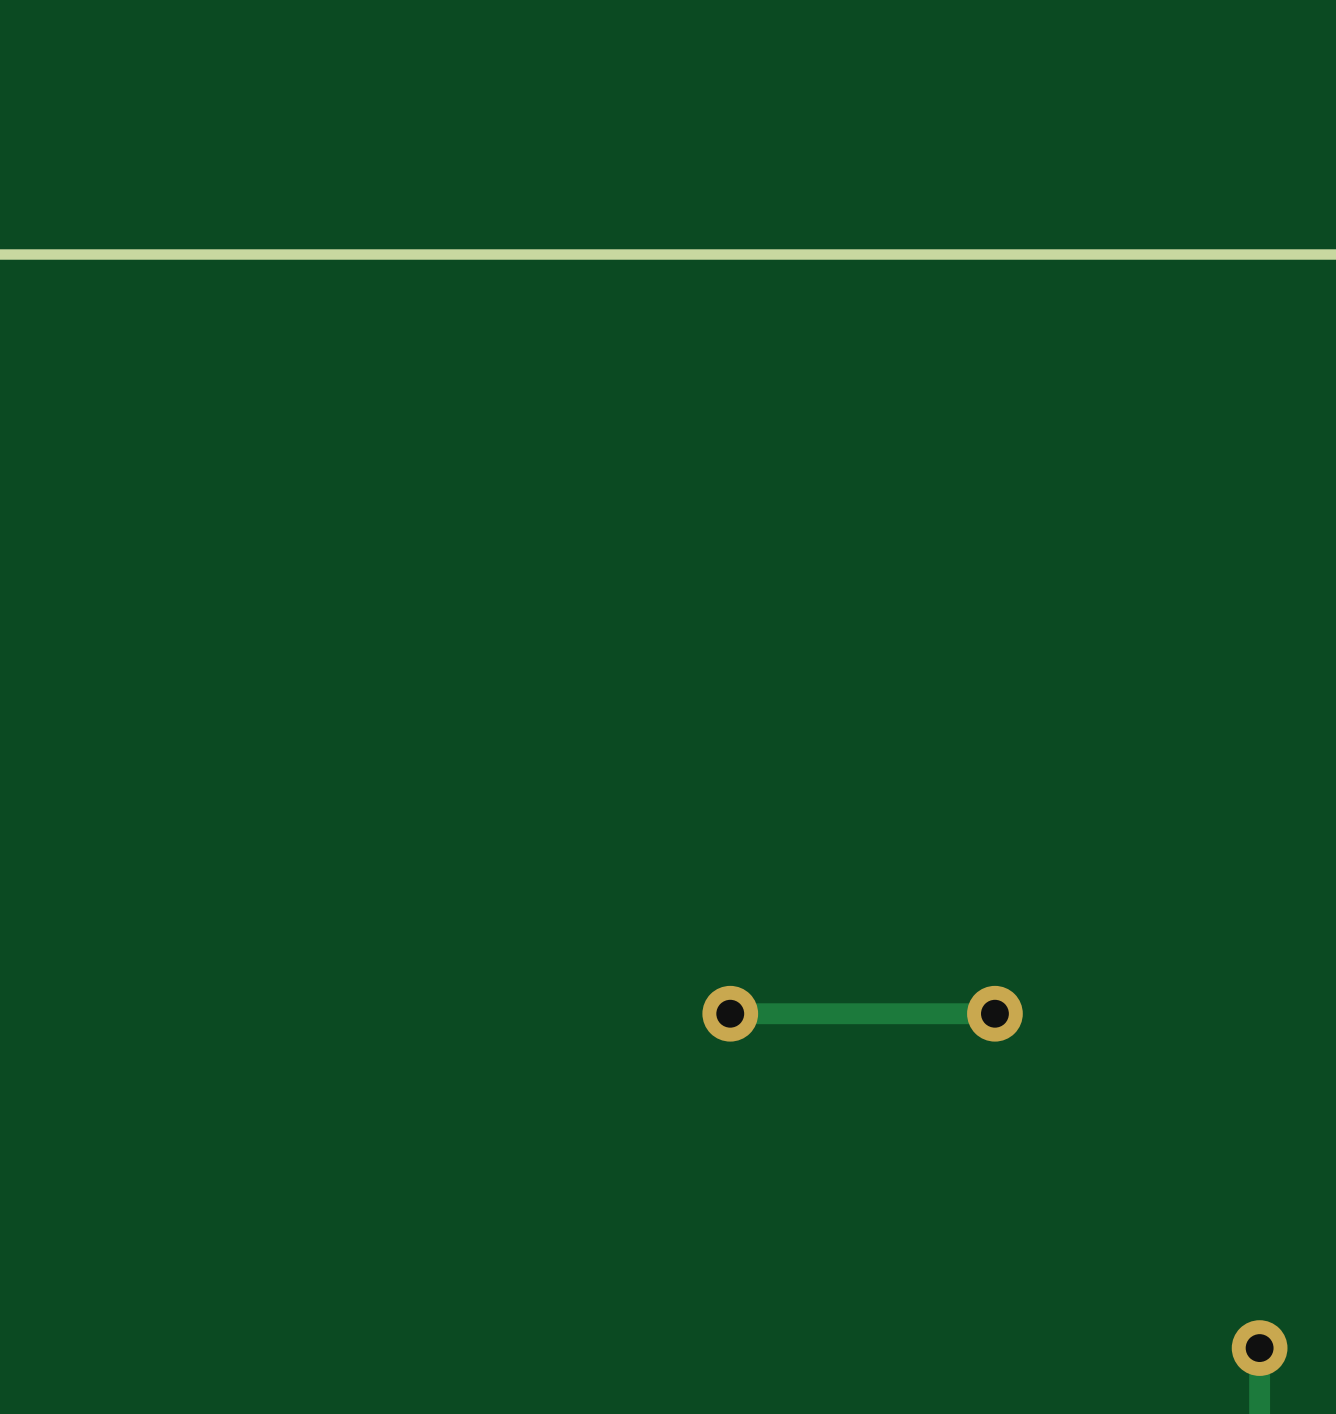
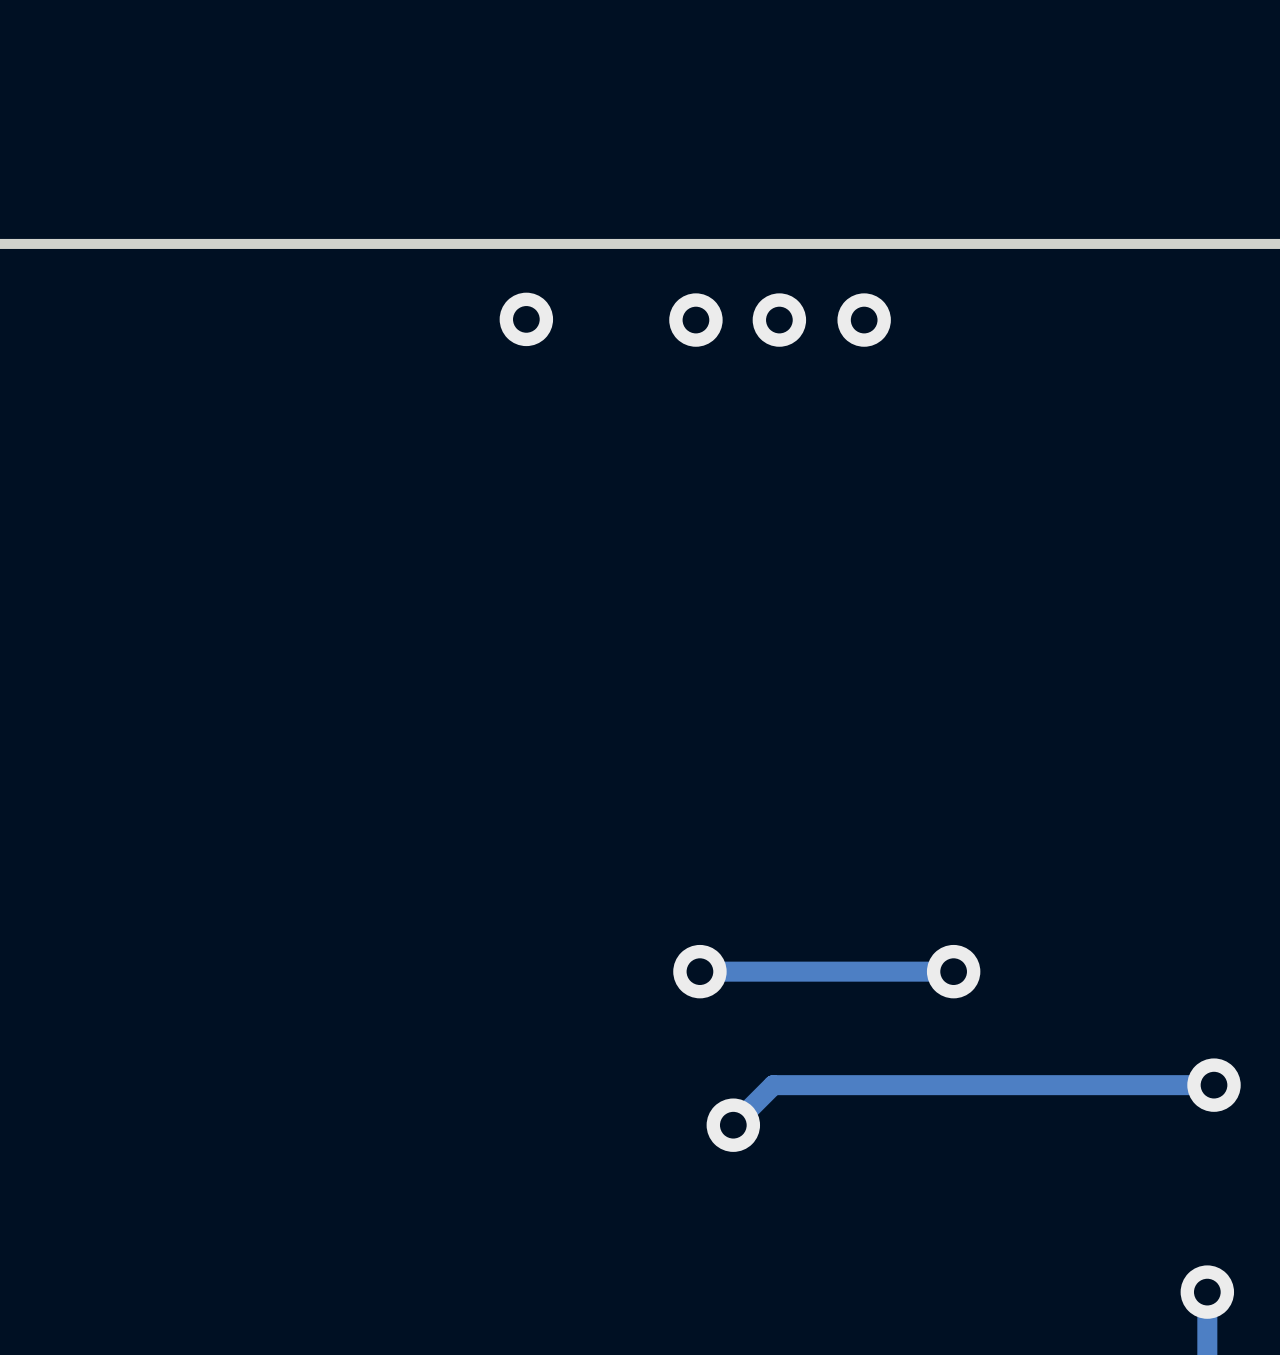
via: none -> (526, 319)
via: none -> (695, 320)
via: none -> (779, 320)
via: none -> (864, 320)
track: none -> (1214, 1085) (773, 1085) (733, 1125)
via: none -> (1214, 1085)
via: none -> (733, 1125)

